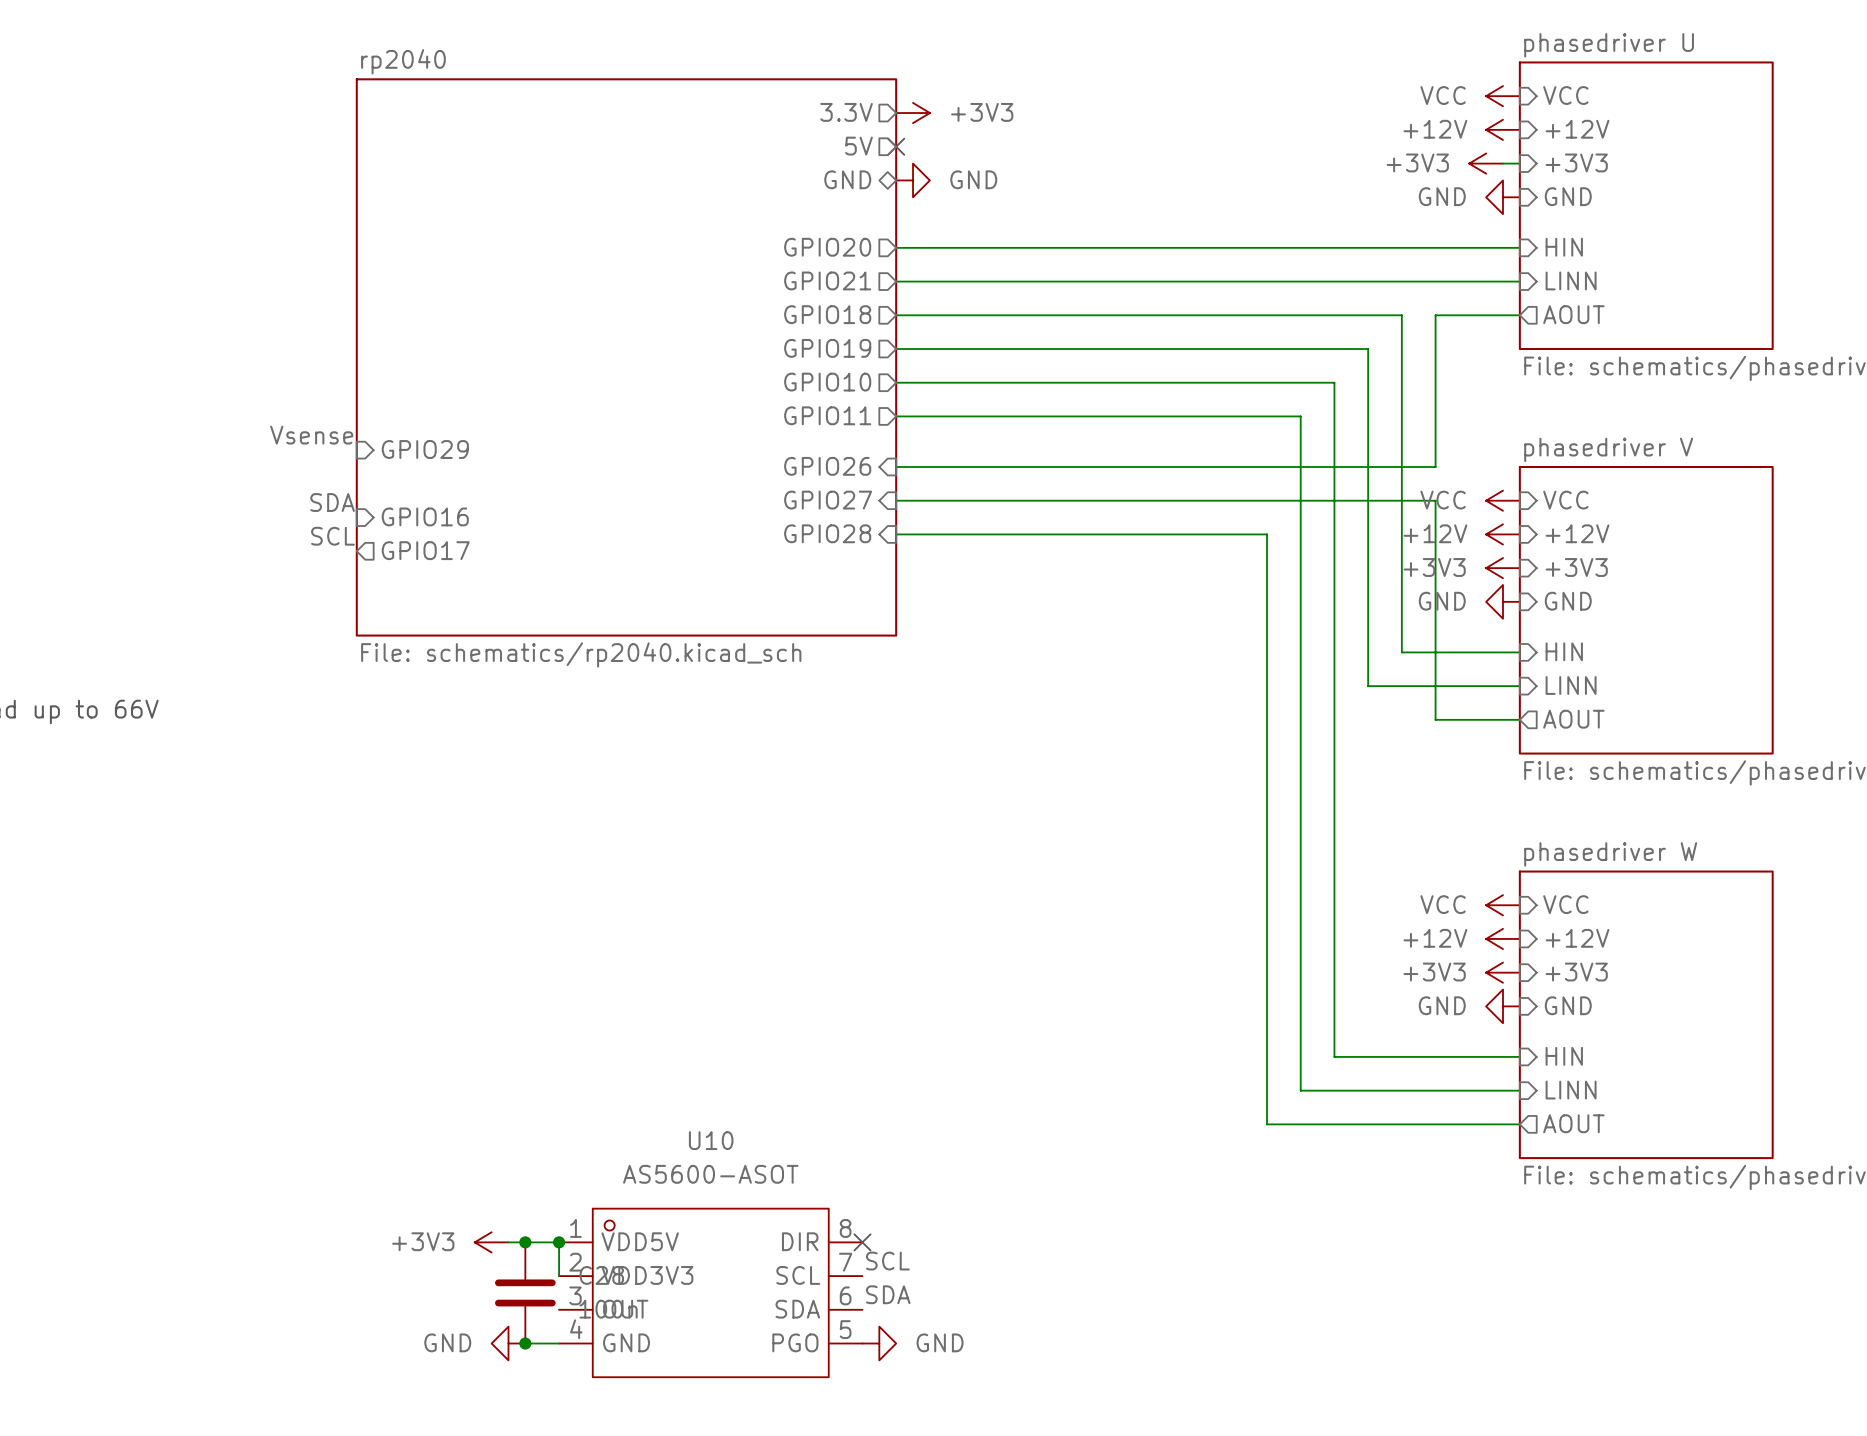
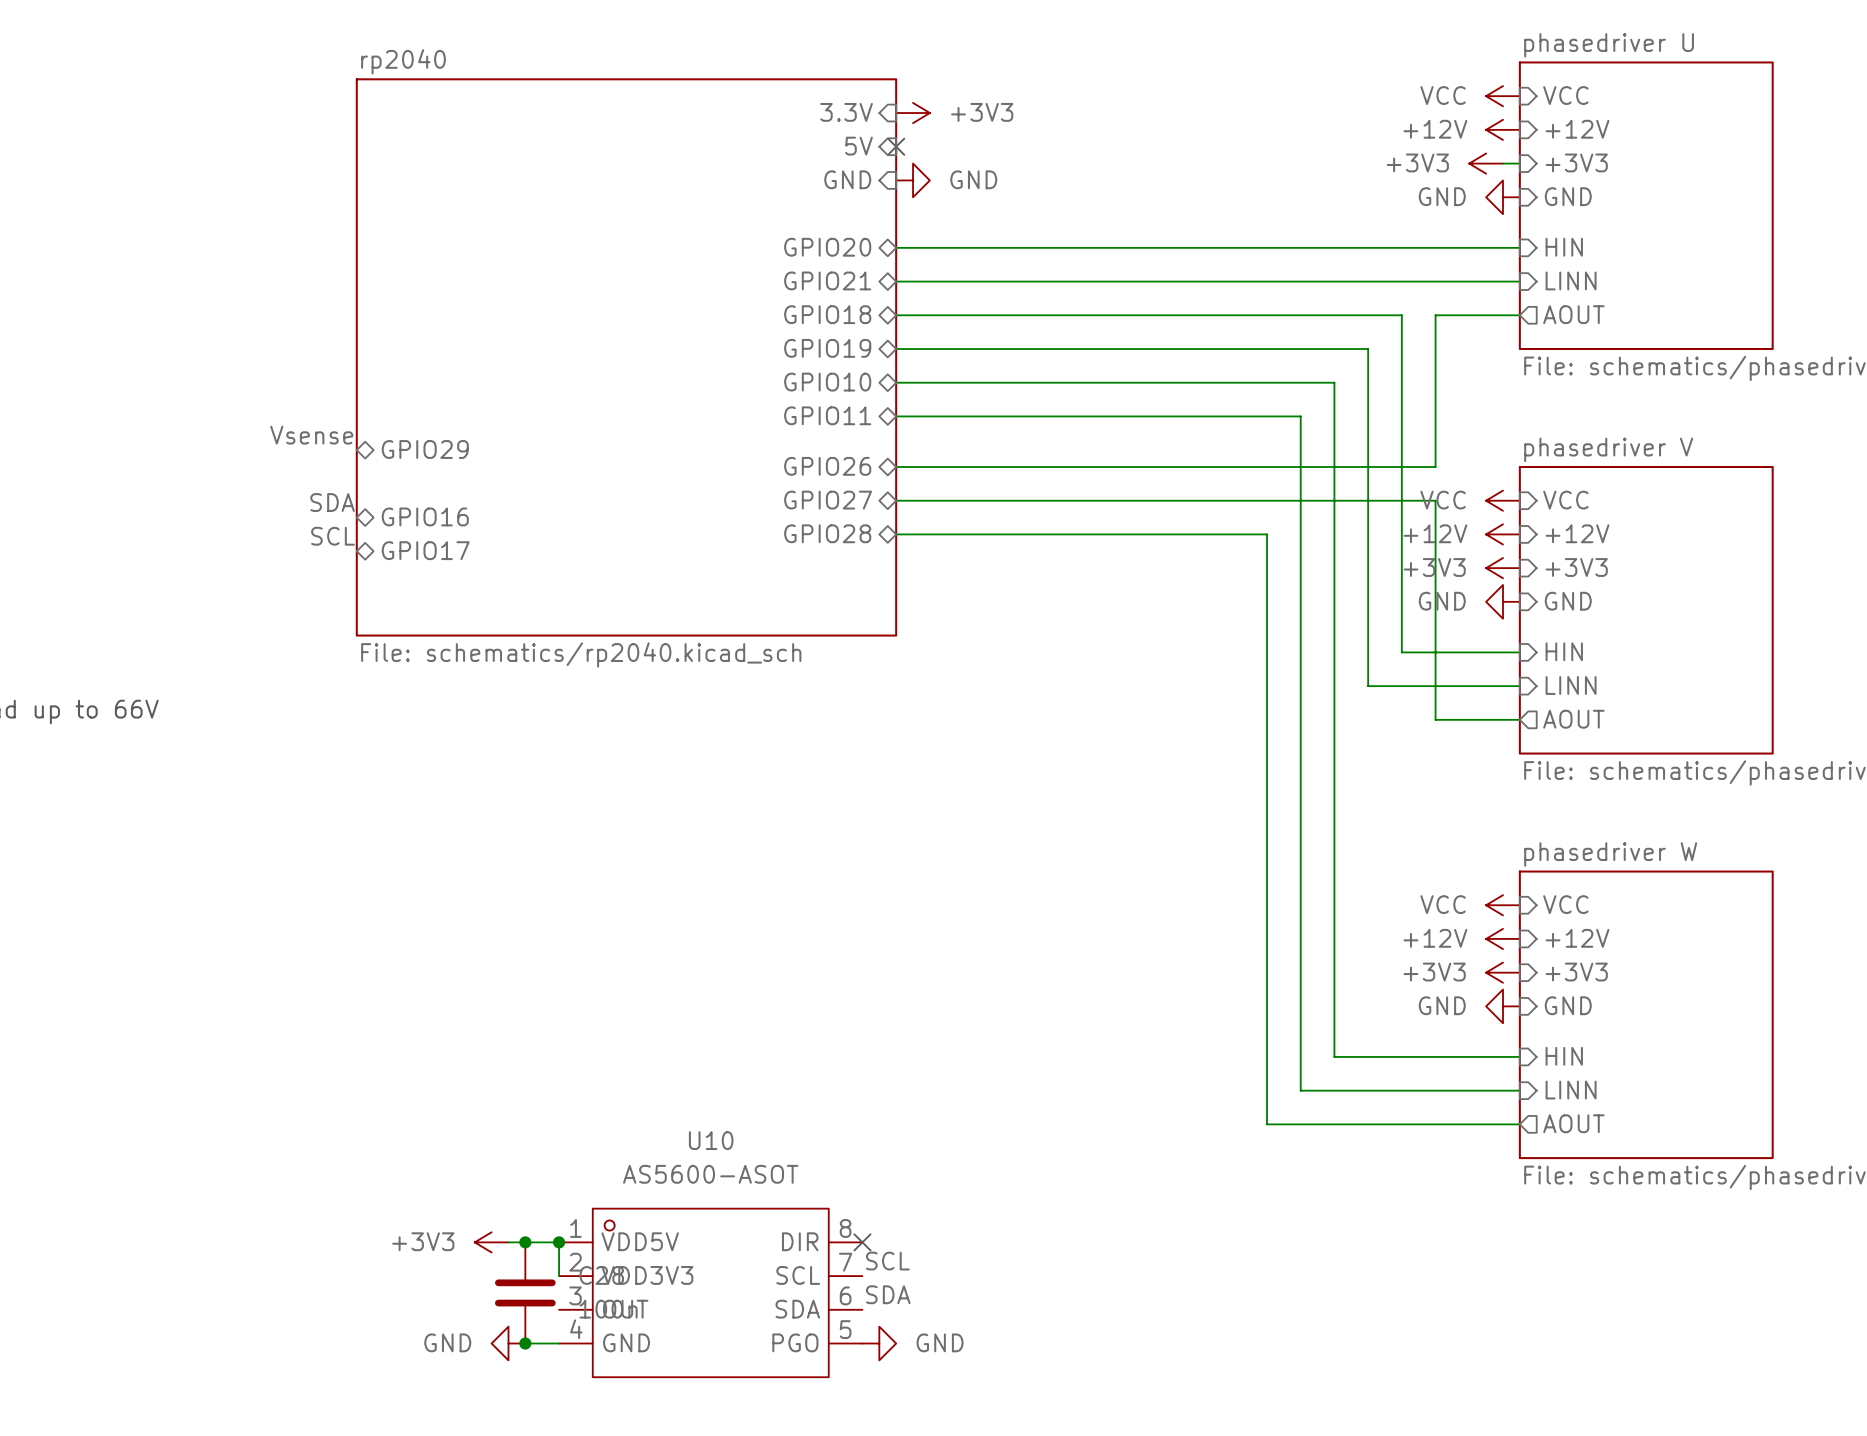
sheet pin shape: output (846, 112) -> input (846, 112)
sheet pin shape: output (858, 146) -> input (858, 146)
sheet pin shape: bidirectional (847, 179) -> input (847, 179)
sheet pin shape: output (827, 247) -> bidirectional (827, 247)
sheet pin shape: output (827, 280) -> bidirectional (827, 280)
sheet pin shape: output (827, 314) -> bidirectional (827, 314)
sheet pin shape: output (827, 348) -> bidirectional (827, 348)
sheet pin shape: output (827, 382) -> bidirectional (827, 382)
sheet pin shape: output (827, 415) -> bidirectional (827, 415)
sheet pin shape: input (425, 449) -> bidirectional (425, 449)
sheet pin shape: input (827, 466) -> bidirectional (827, 466)
sheet pin shape: input (828, 500) -> bidirectional (828, 500)
sheet pin shape: input (425, 516) -> bidirectional (425, 516)
sheet pin shape: input (827, 533) -> bidirectional (827, 533)
sheet pin shape: output (425, 550) -> bidirectional (425, 550)

